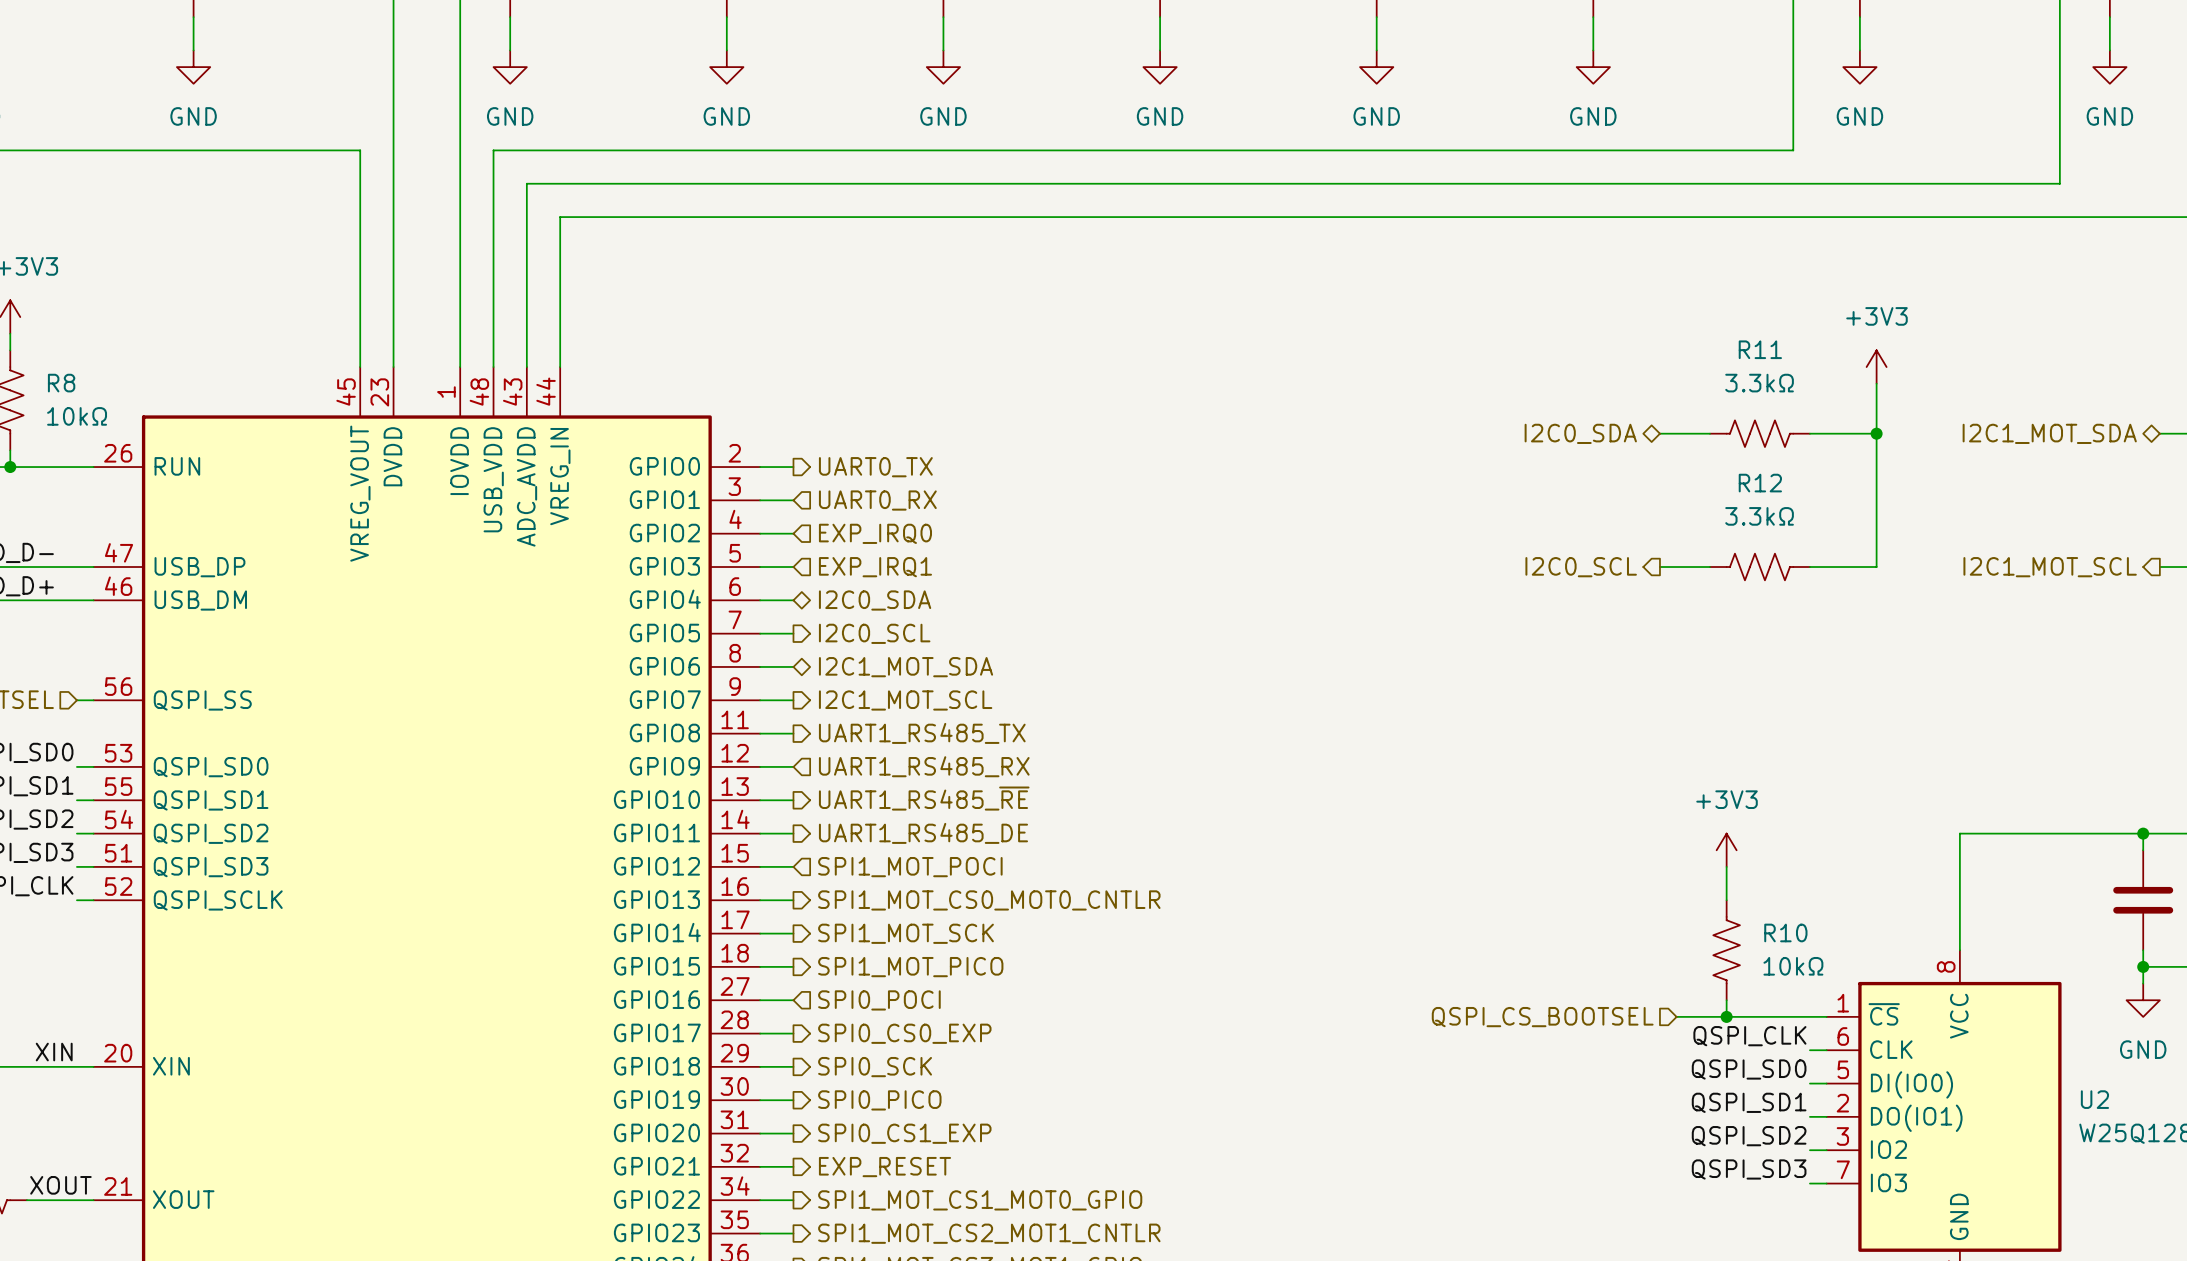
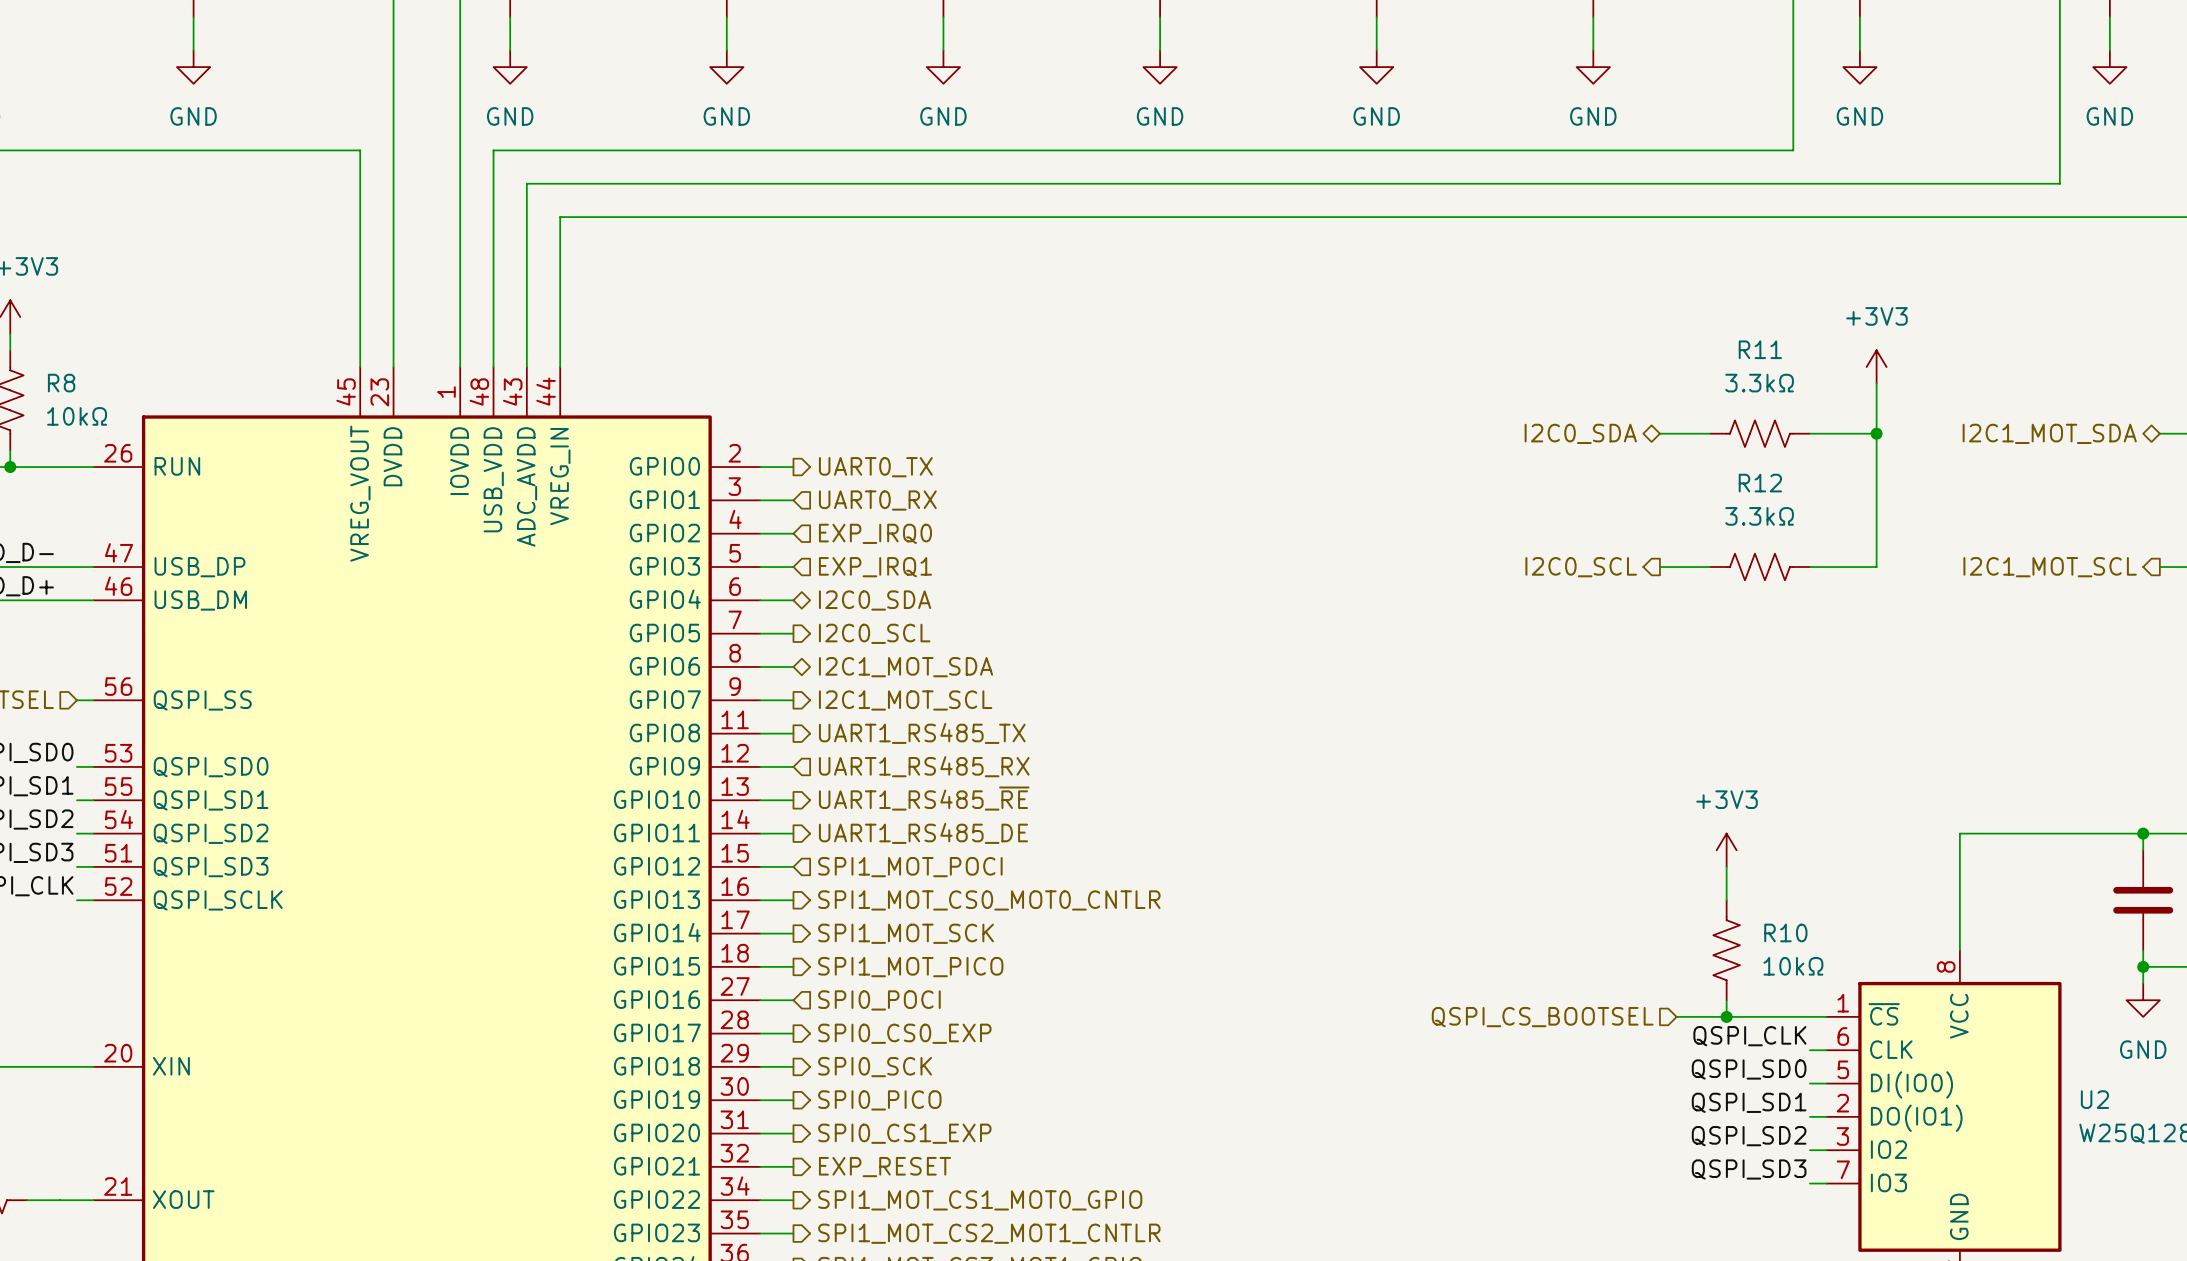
label: XIN (54, 1052) -> none
label: XOUT (60, 1185) -> none

